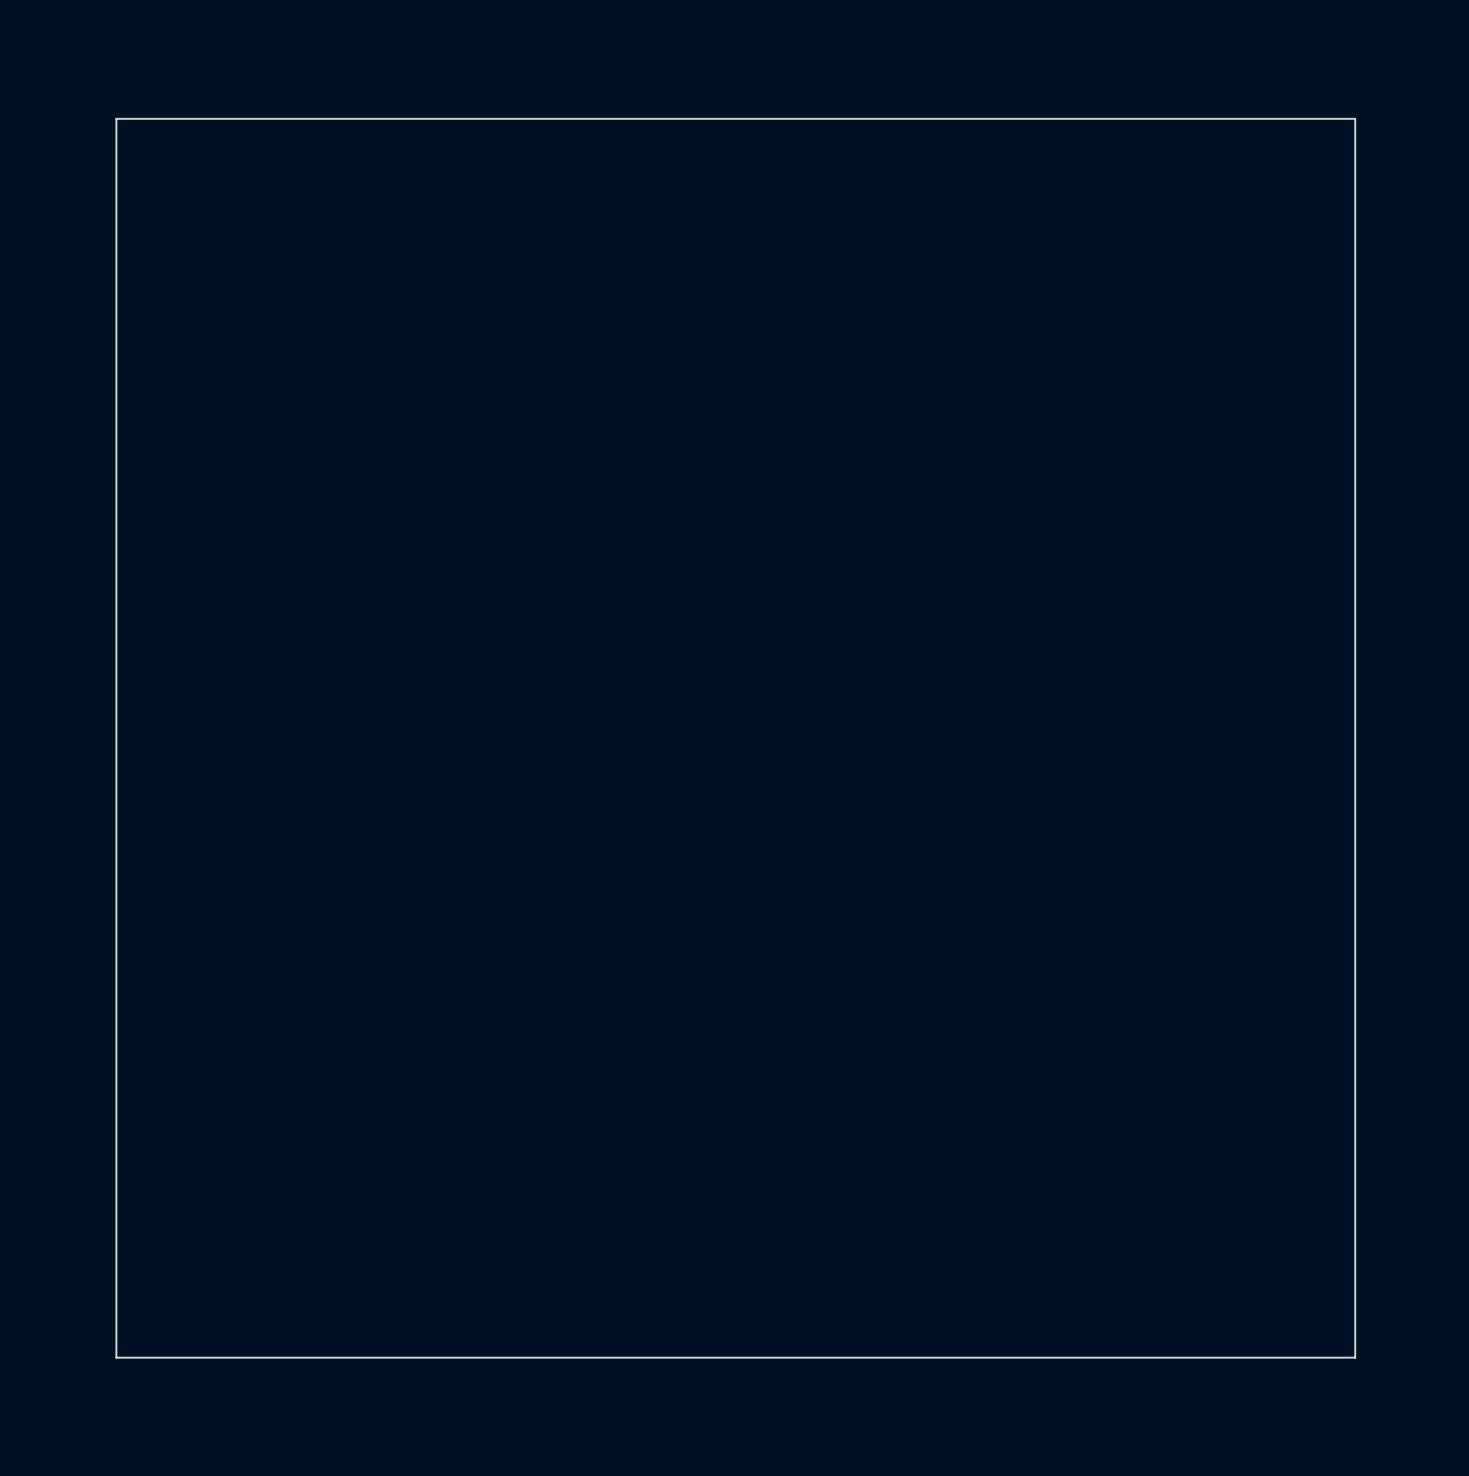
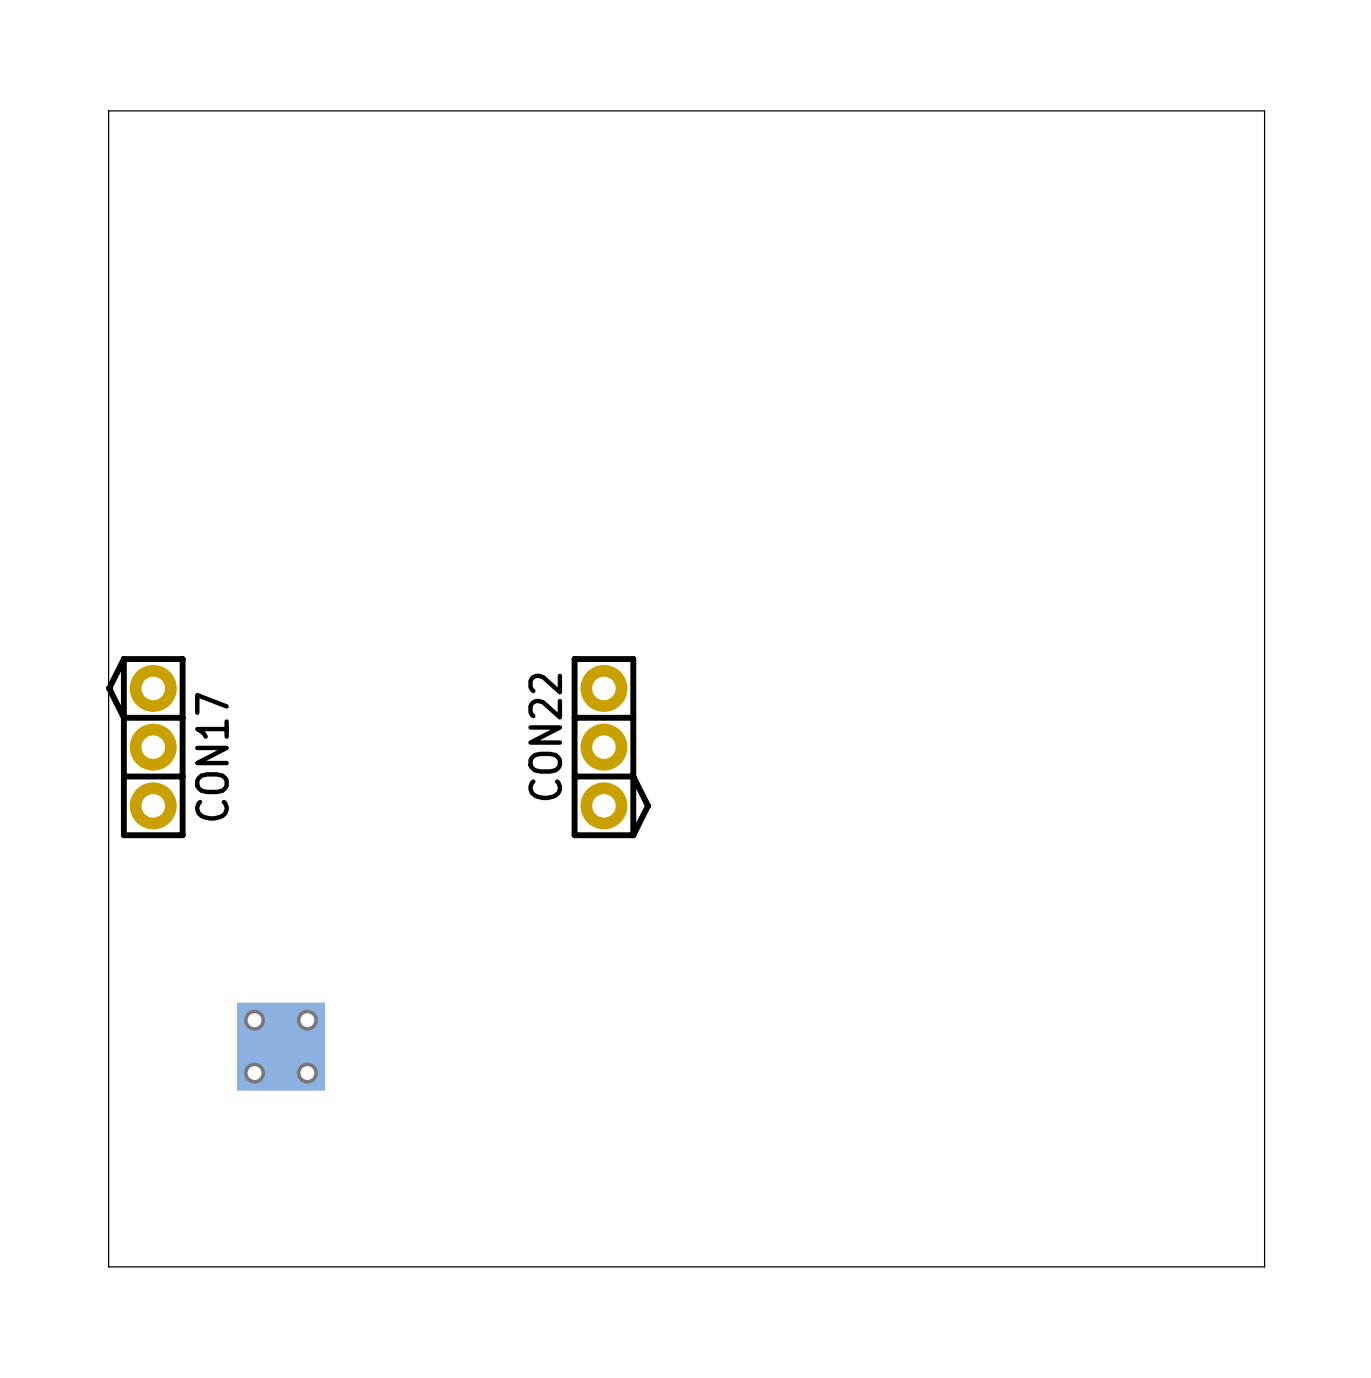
CON17: none -> (145, 747)
CON22: none -> (611, 747)
drawing: none -> [236, 1002, 326, 1091]
via: none -> (254, 1020)
via: none -> (307, 1020)
via: none -> (254, 1073)
via: none -> (307, 1073)

